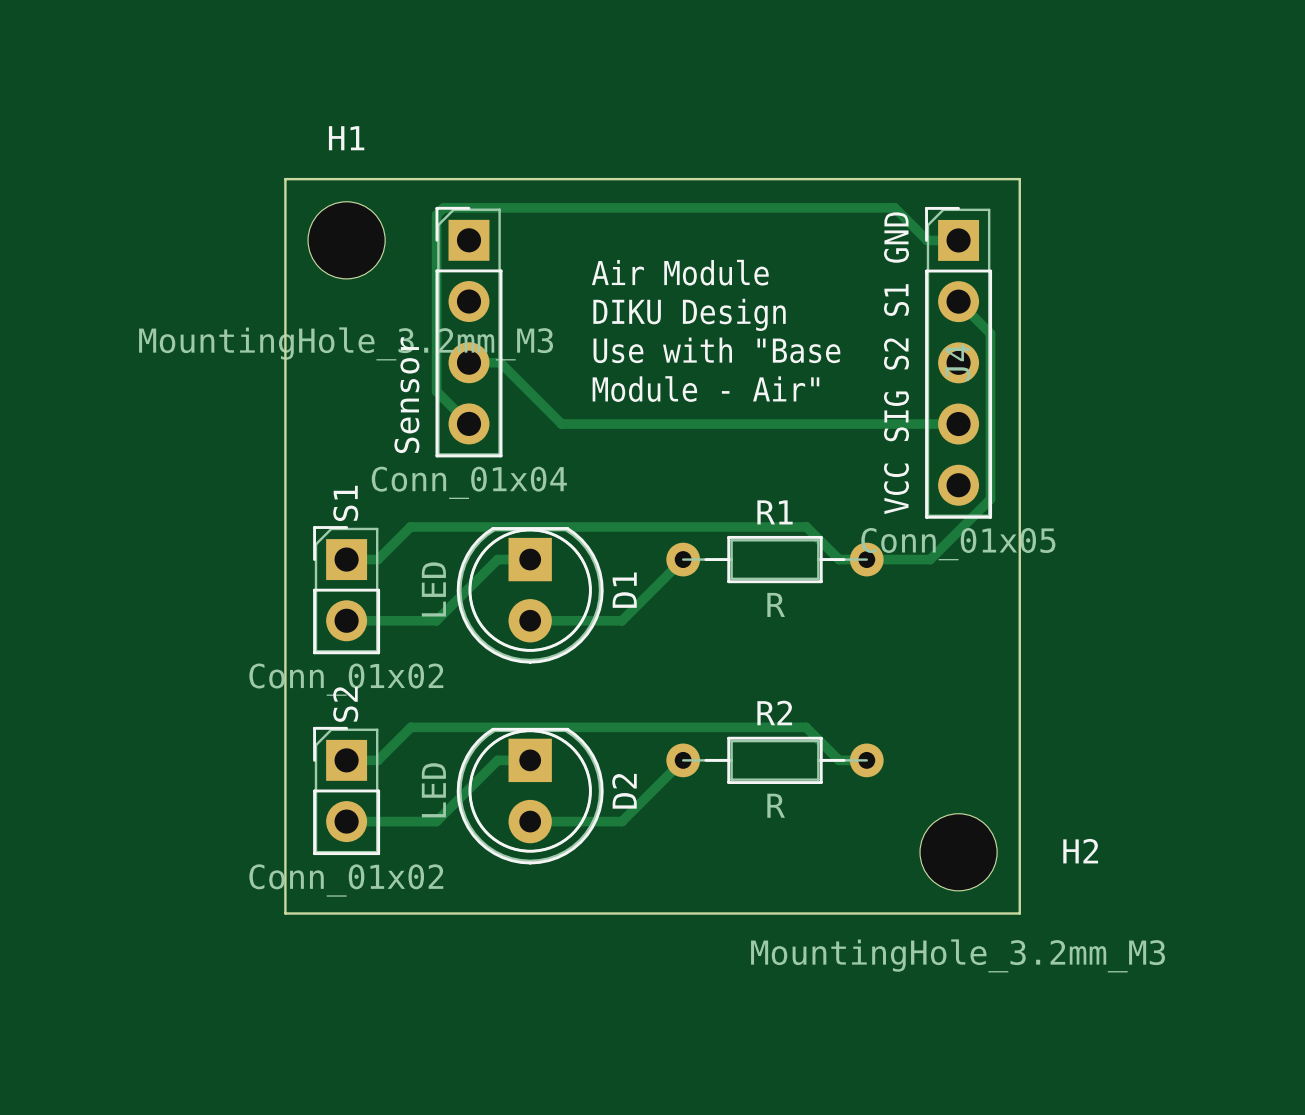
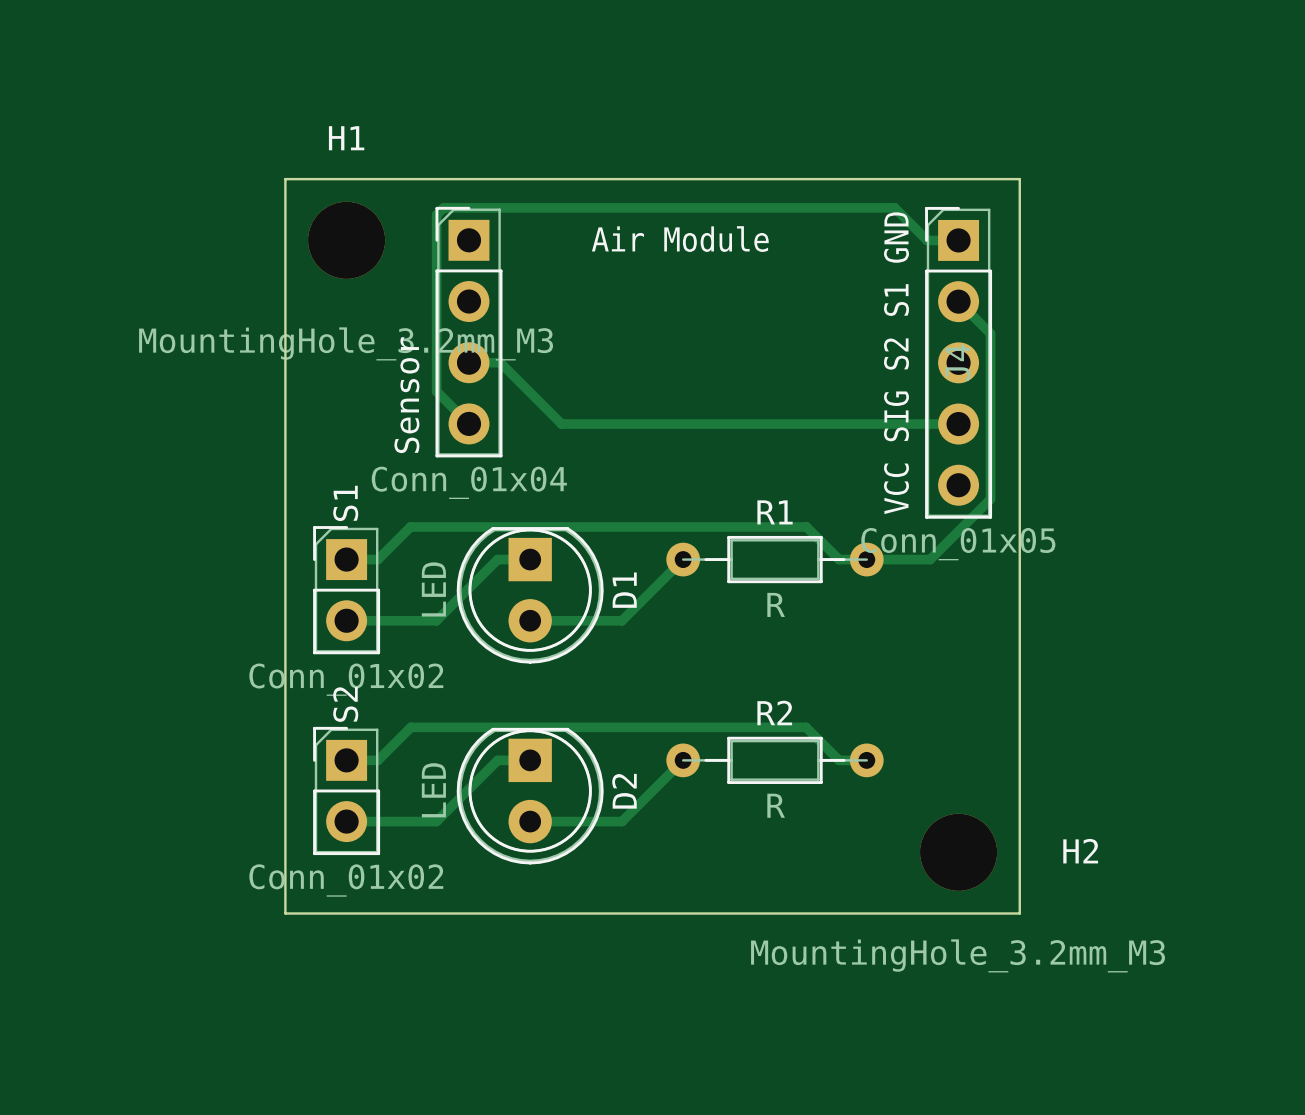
H1 footprint: [308, 201, 386, 279] -> [308, 201, 386, 279]
text position: Air Module (680, 272) -> Air Module (680, 239)
text: DIKU Design (689, 314) -> none
text: Use with "Base (716, 350) -> none
text: Module - Air" (705, 389) -> none
H2 footprint: [920, 813, 998, 891] -> [920, 813, 998, 891]

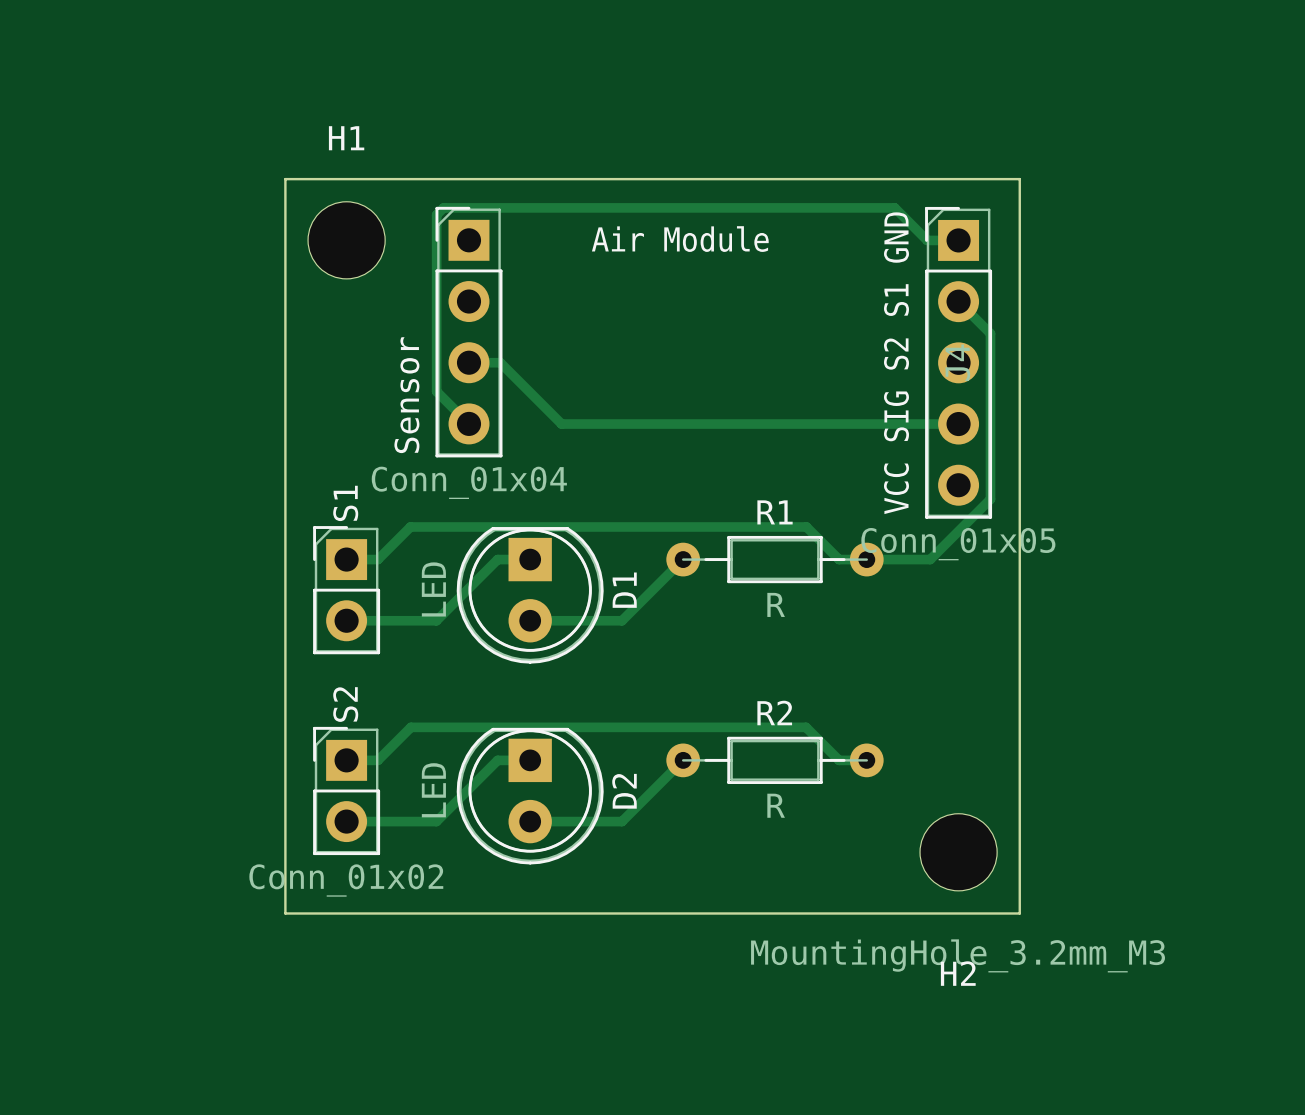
H1 footprint: [308, 201, 386, 279] -> [308, 201, 386, 279]
H1 value: MountingHole_3.2mm_M3 (346, 343) -> none
S1 value: Conn_01x02 (346, 679) -> none
H2 footprint: [920, 813, 998, 891] -> [920, 813, 998, 891]
H2 name position: H2 (1080, 851) -> H2 (958, 973)

